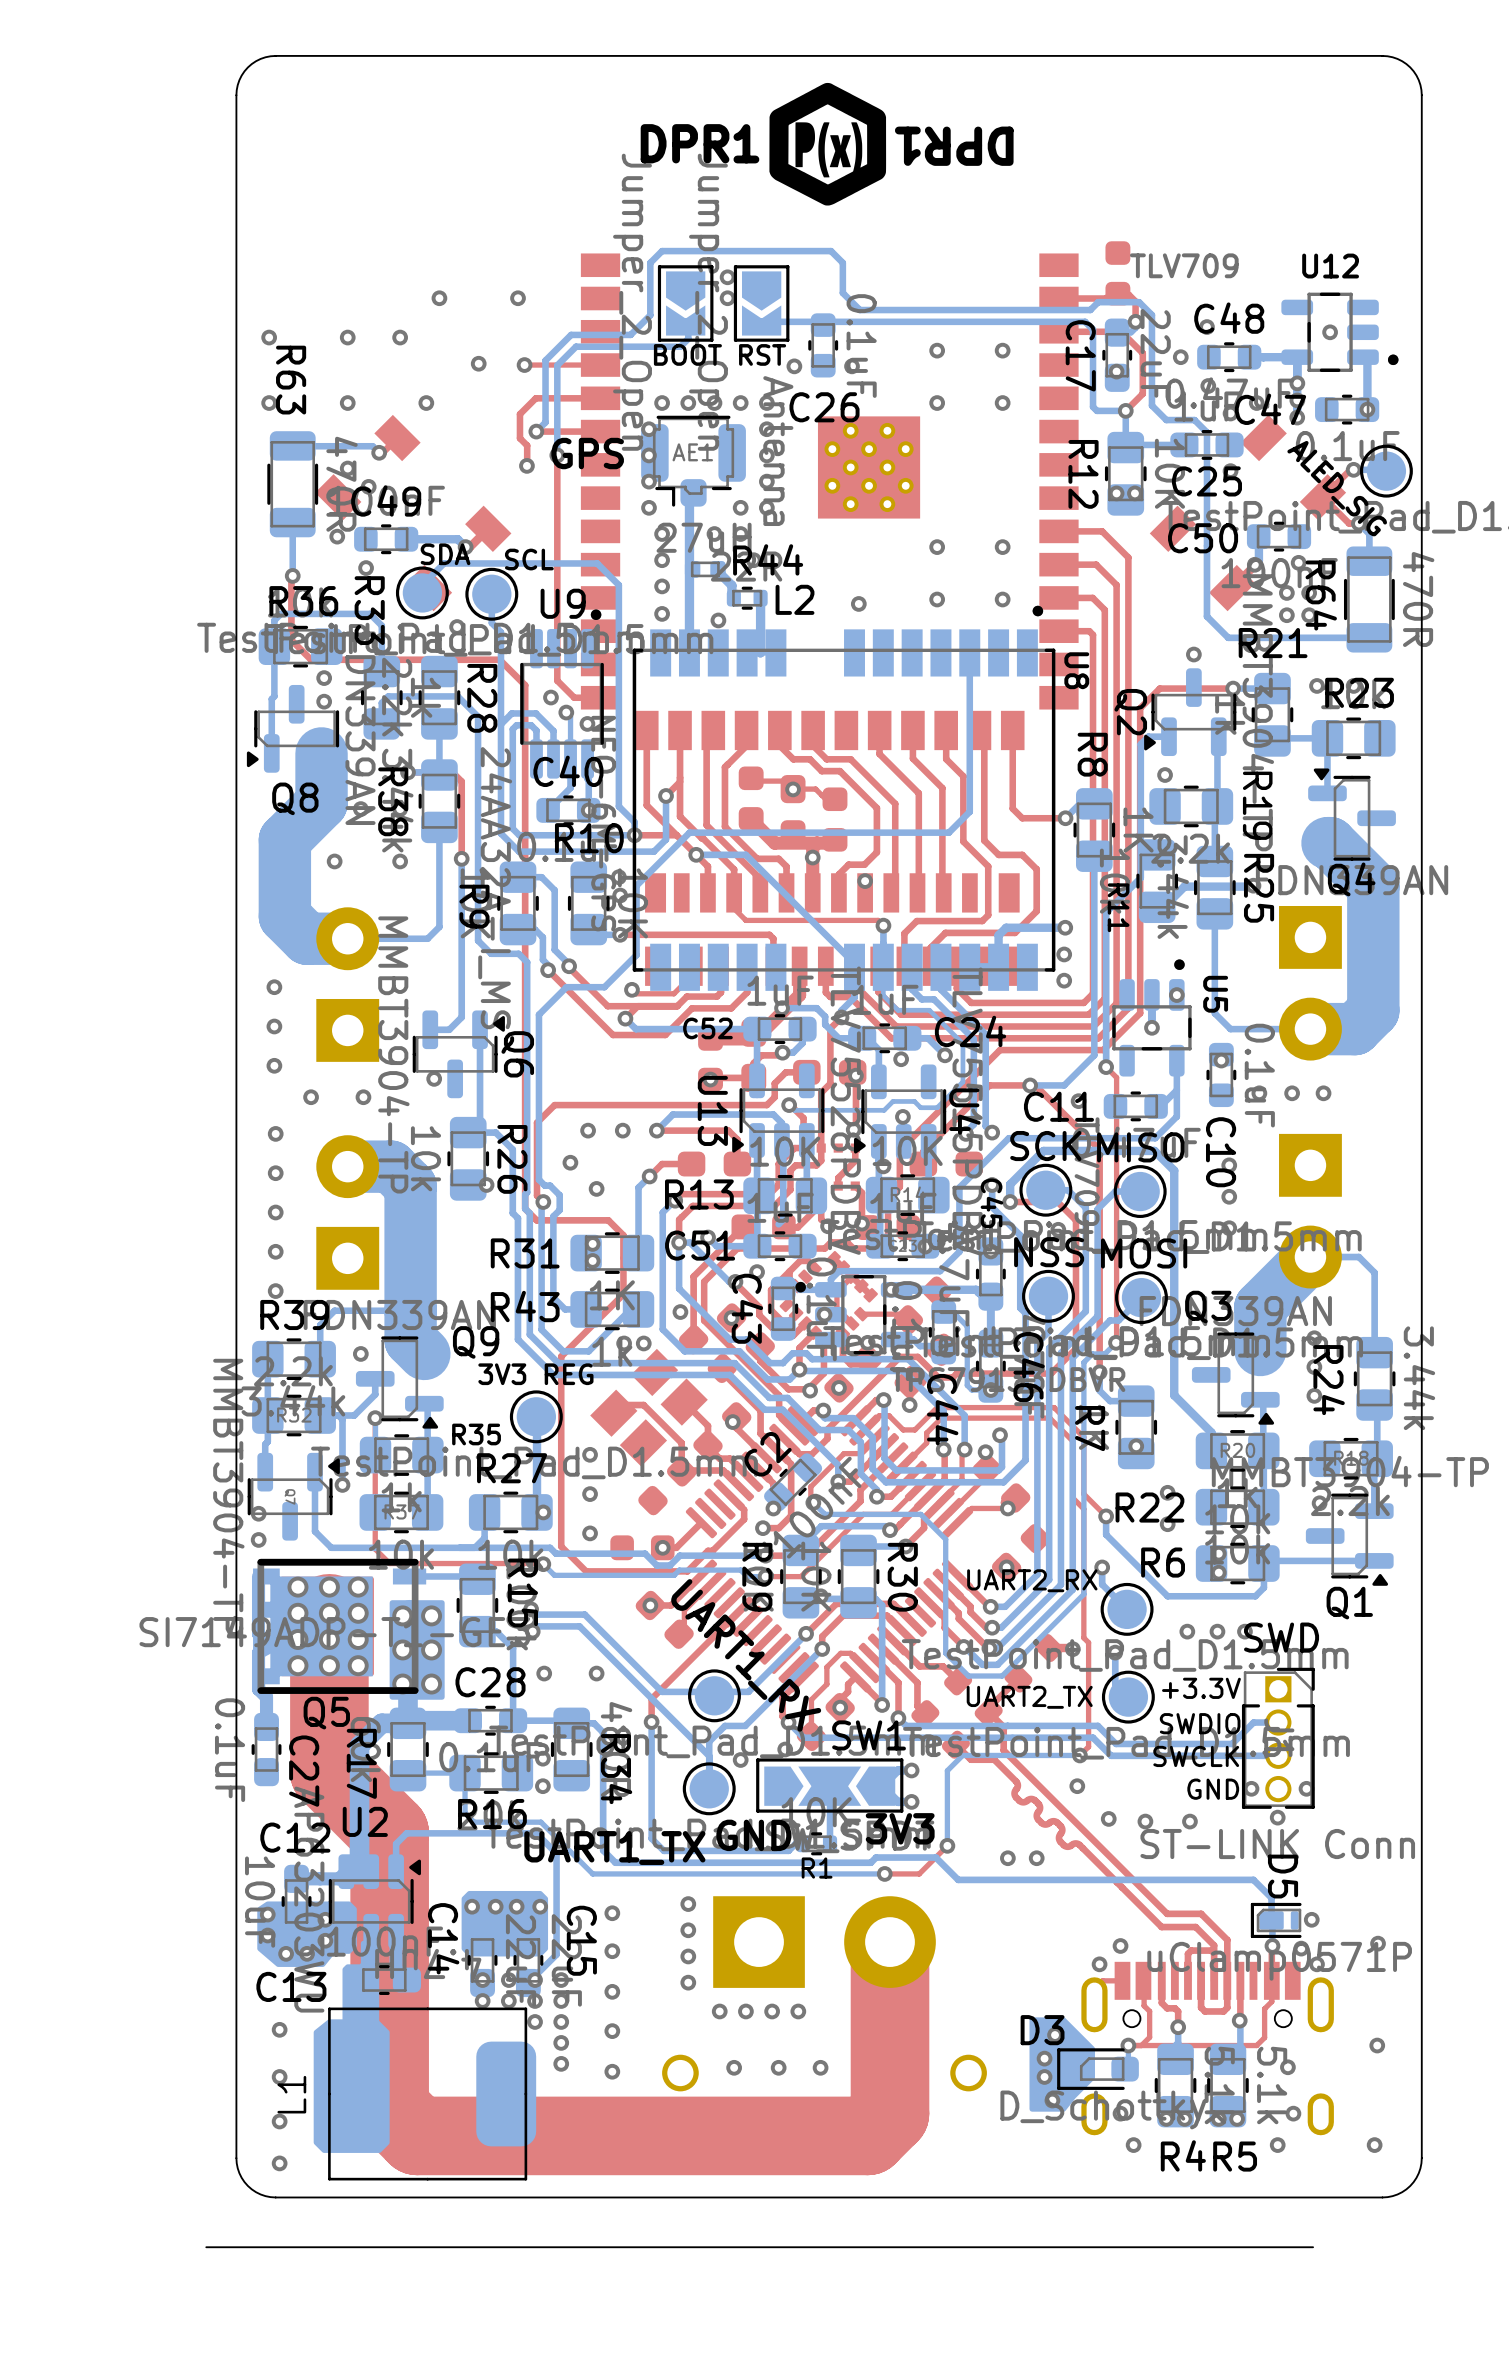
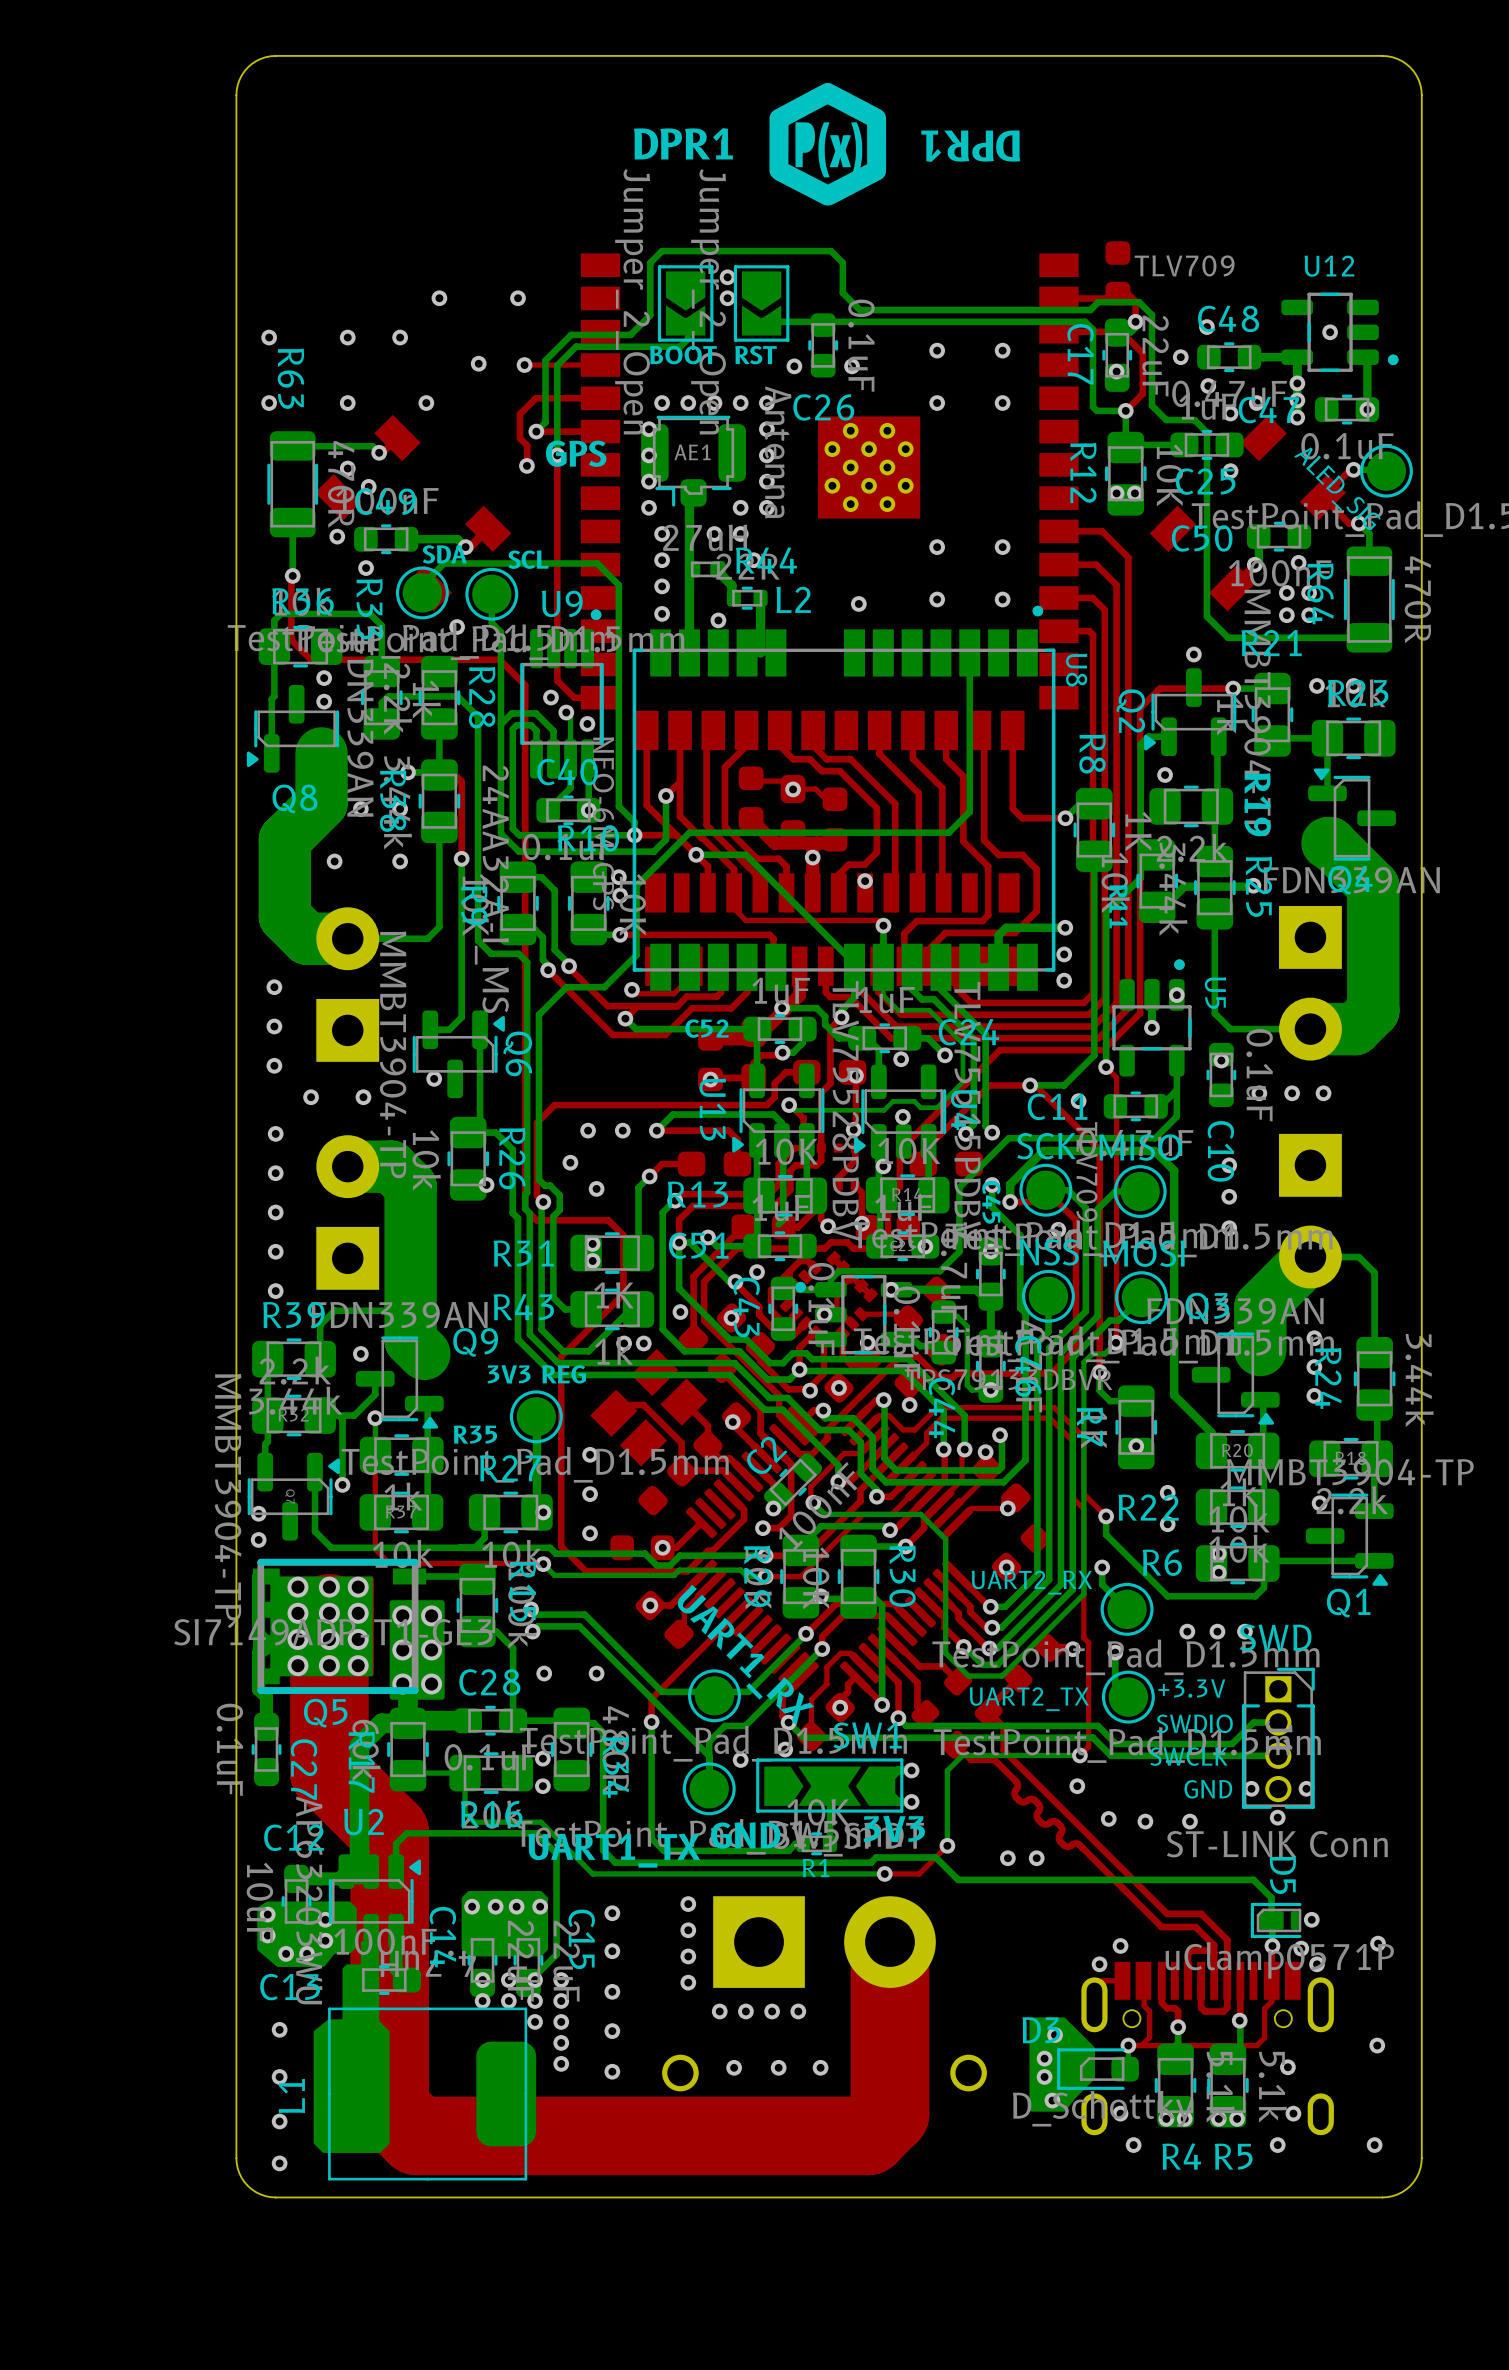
board edge: (1313, 2247) (206, 2247) -> none

